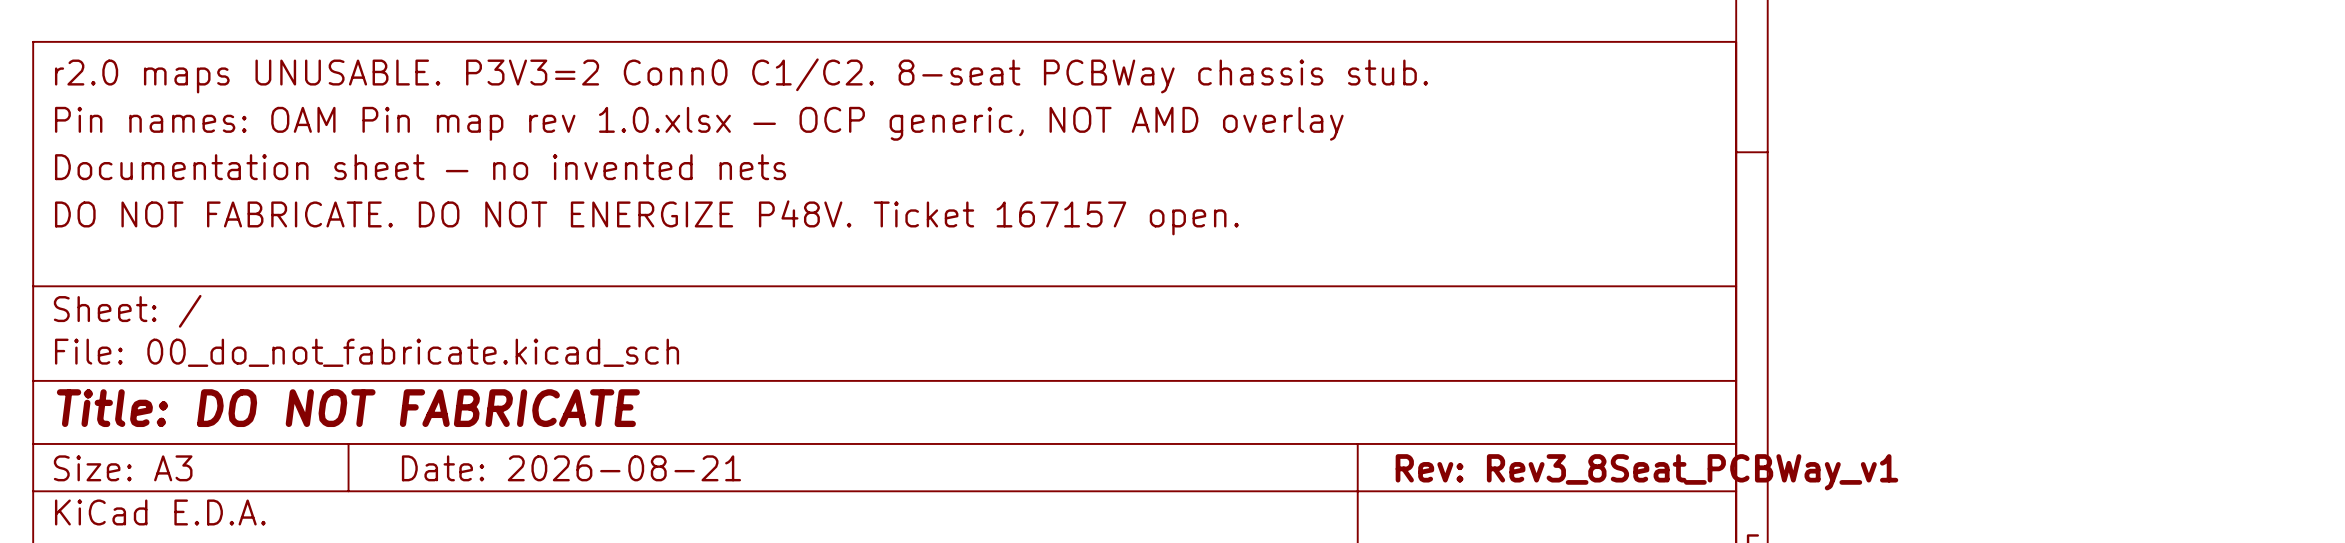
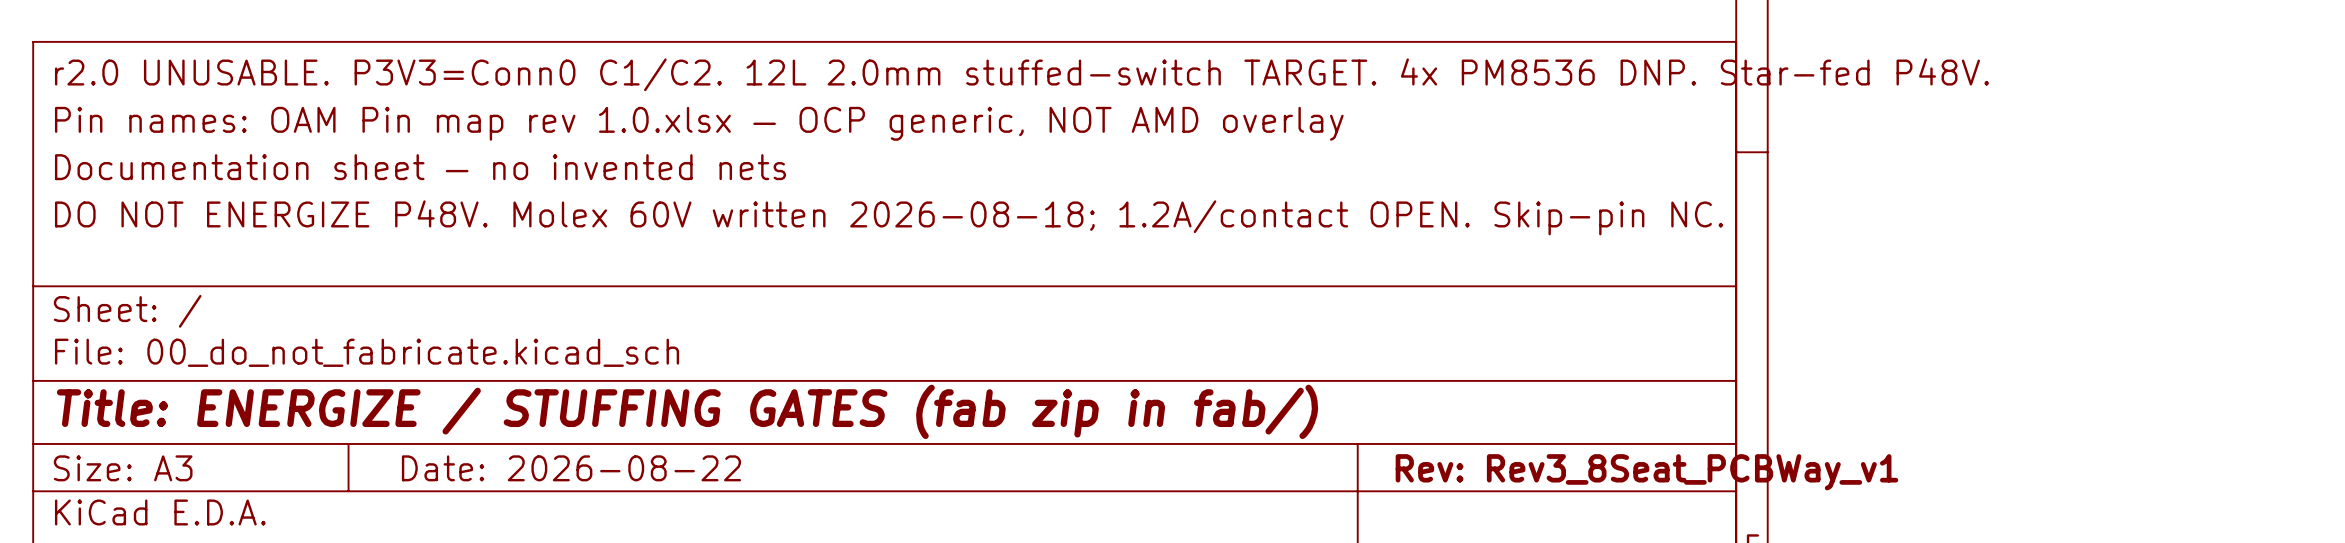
title block: r2.0 maps UNUSABLE. P3V3=2 Conn0 C1/C2. 8-seat PCBWay chassis stub. (741, 75) -> r2.0 UNUSABLE. P3V3=Conn0 C1/C2. 12L 2.0mm stuffed-switch TARGET. 4x PM8536 DNP. Star-fed P48V. (1021, 74)
title block: DO NOT FABRICATE. DO NOT ENERGIZE P48V. Ticket 167157 open. (646, 217) -> DO NOT ENERGIZE P48V. Molex 60V written 2026-08-18; 1.2A/contact OPEN. Skip-pin NC. (889, 217)
title block: Title: DO NOT FABRICATE (348, 408) -> Title: ENERGIZE / STUFFING GATES (fab zip in fab/) (687, 411)
title block: Date: 2026-08-21 (571, 468) -> Date: 2026-08-22 (571, 468)

